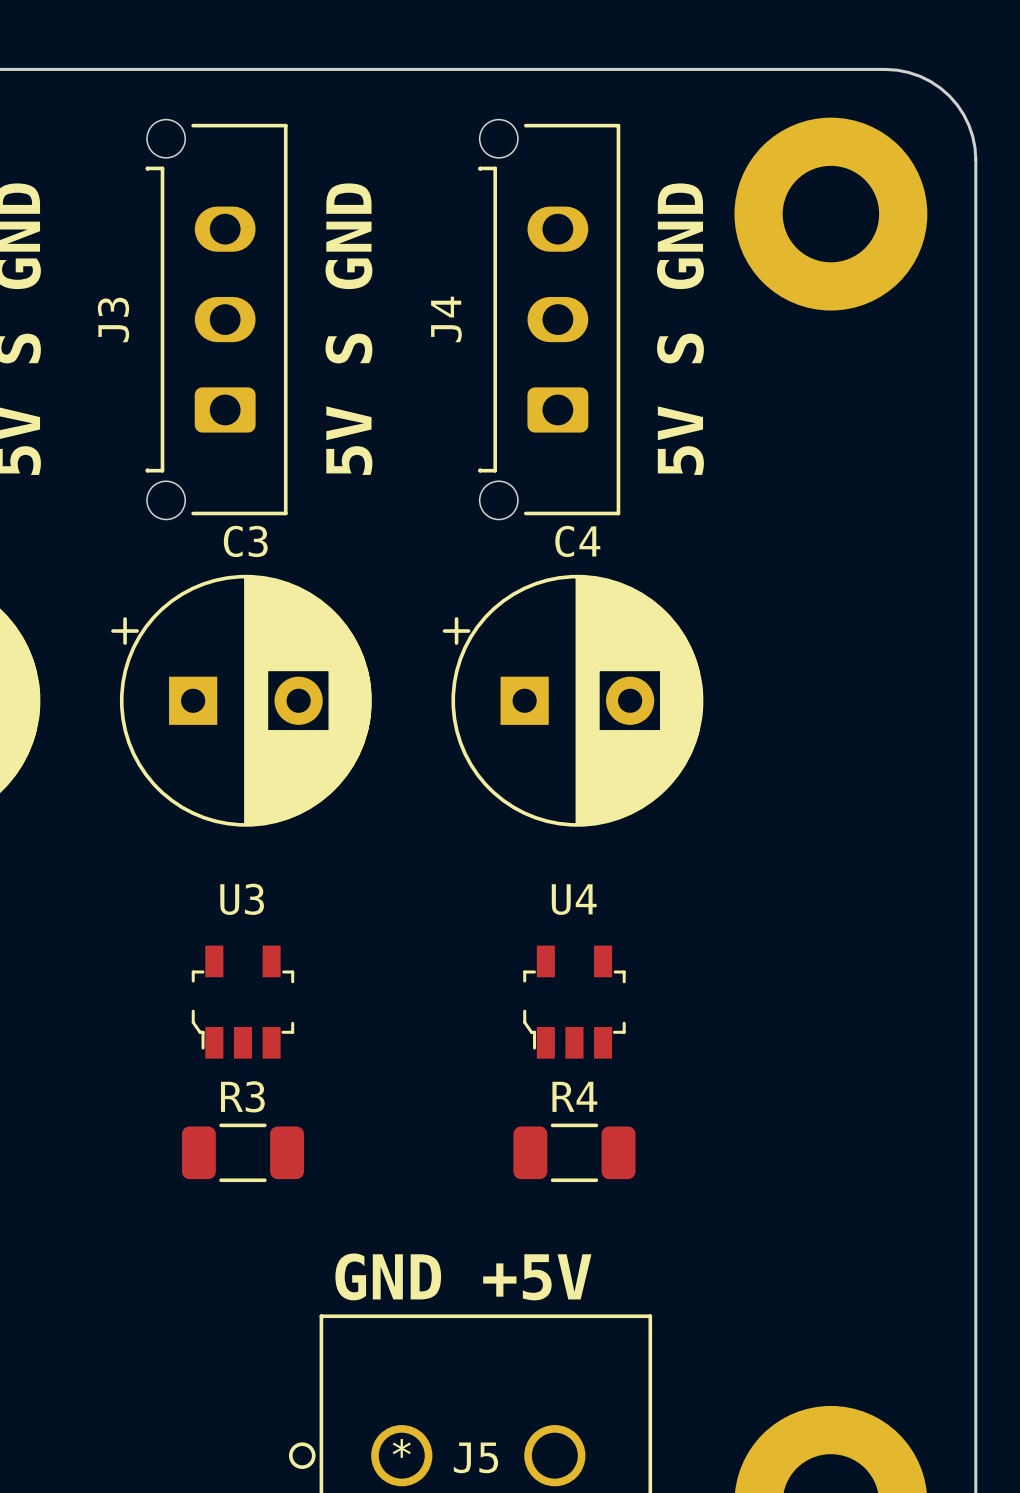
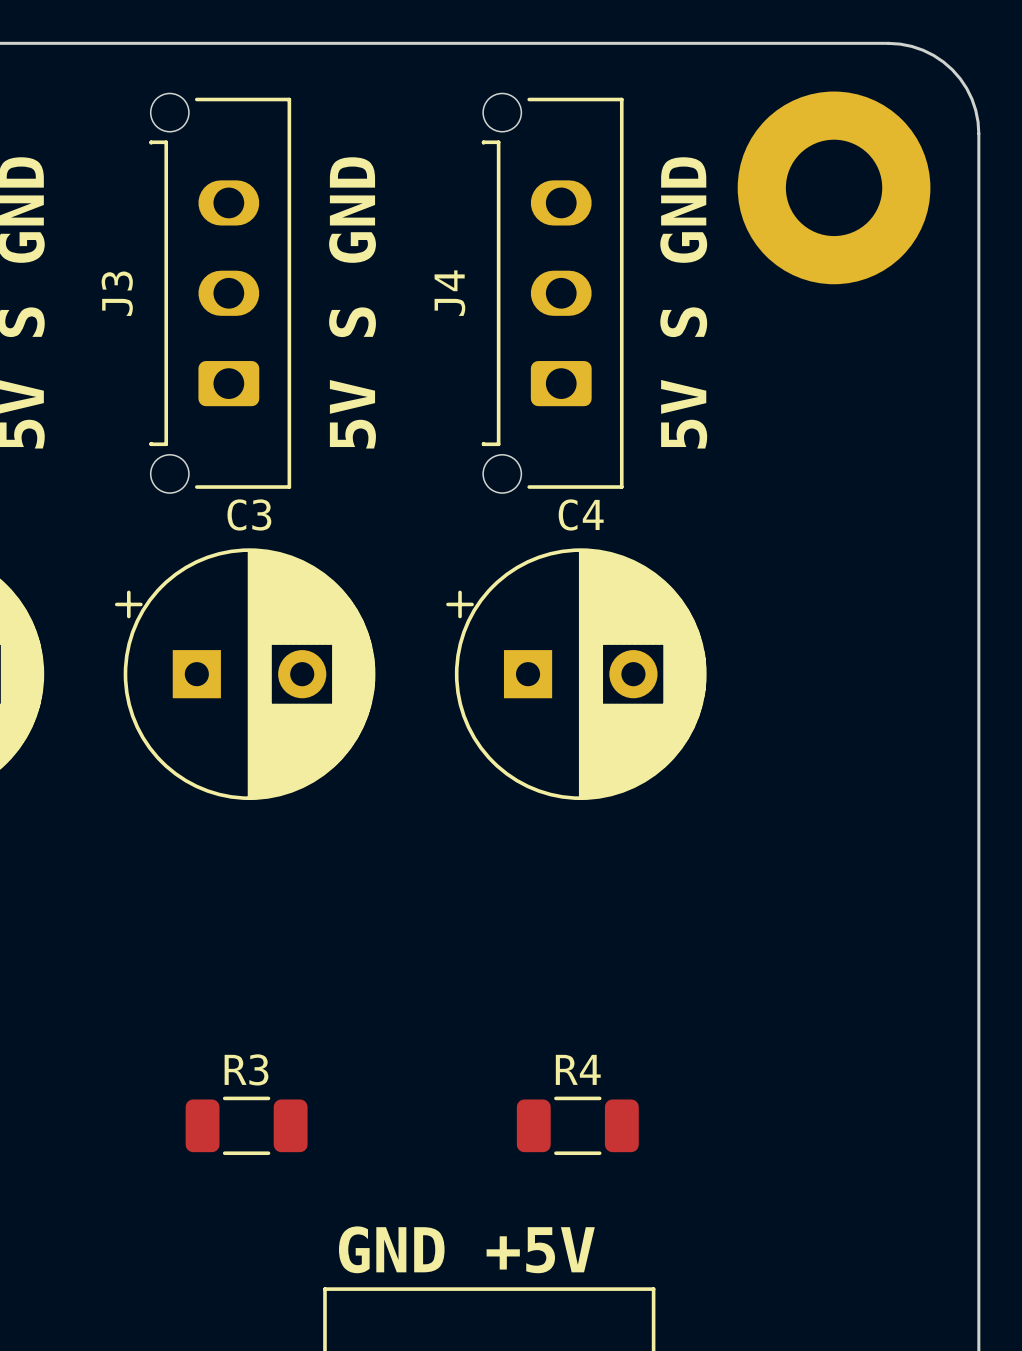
U3: (242, 1002) -> none
U4: (574, 1002) -> none

